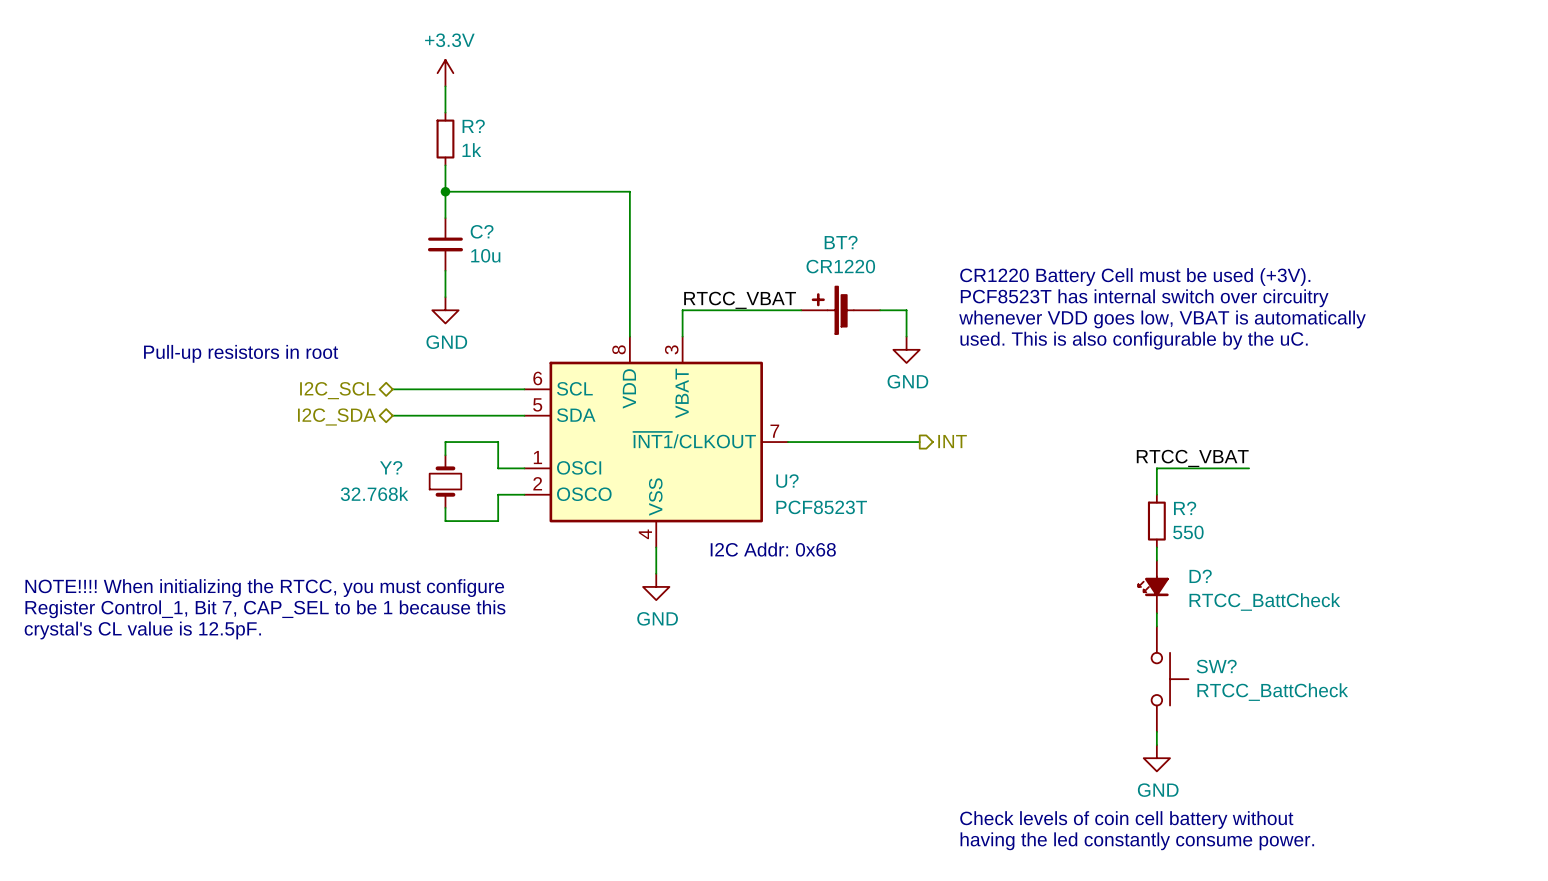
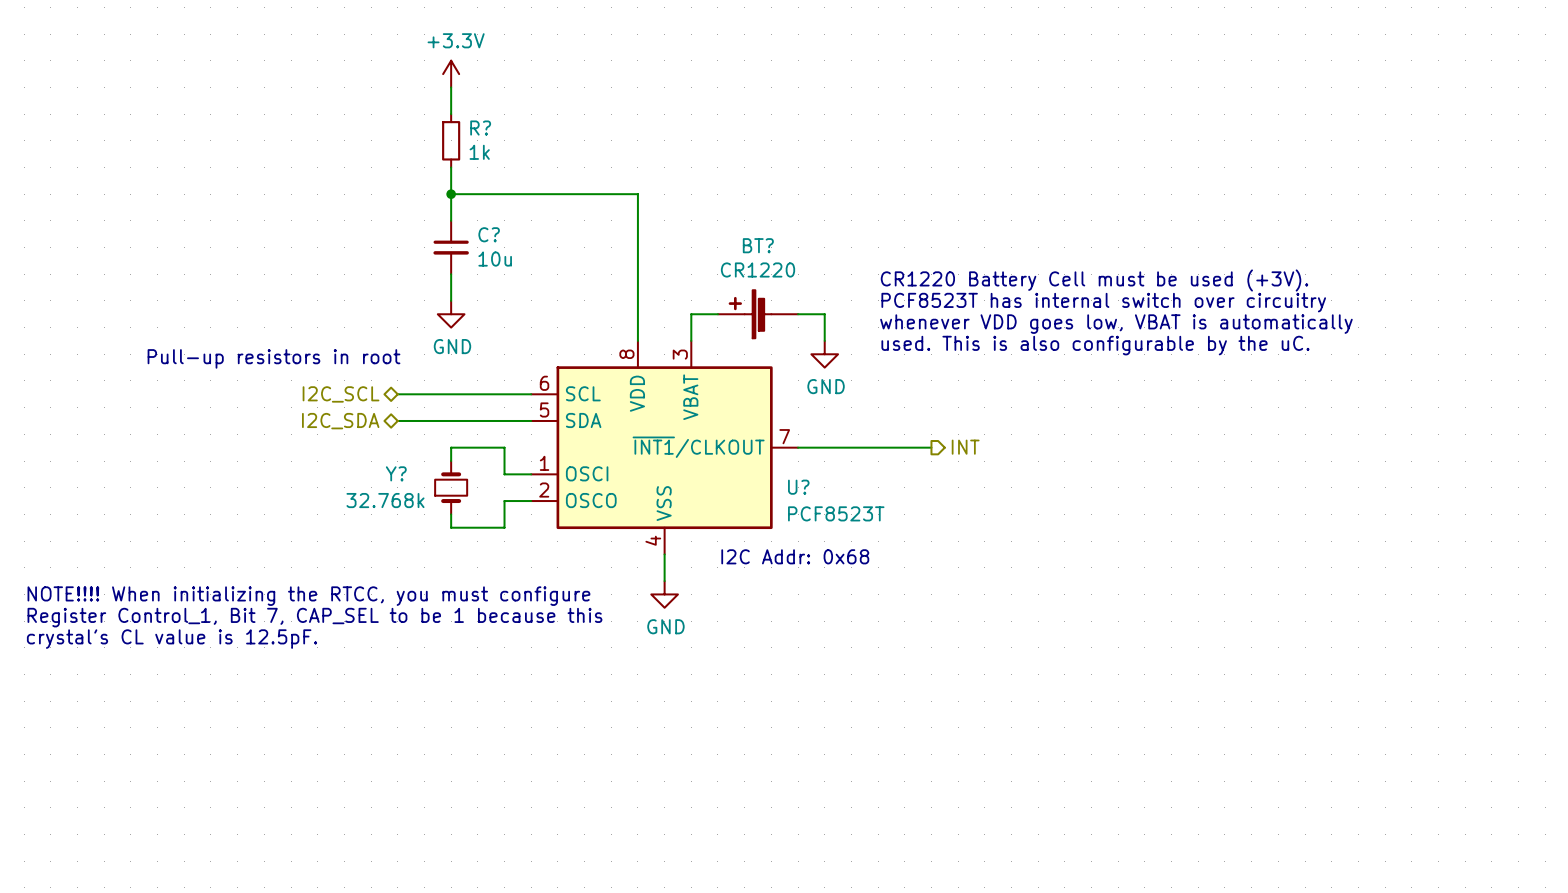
text position: CR1220 Battery Cell must be used (+3V). (1135, 277) -> CR1220 Battery Cell must be used (+3V). (1094, 280)
text position: PCF8523T has internal switch over circuitry (1144, 298) -> PCF8523T has internal switch over circuitry (1103, 302)
label: RTCC_VBAT (740, 300) -> none
wire: none -> (811, 314) (824, 314) (824, 340)
BT? position: (840, 310) -> (758, 314)
wire: (880, 310) (906, 310) (906, 336) -> none
text position: whenever VDD goes low, VBAT is automatically (1162, 319) -> whenever VDD goes low, VBAT is automatically (1116, 324)
text position: used. This is also configurable by the uC. (1134, 340) -> used. This is also configurable by the uC. (1095, 345)
power symbol position: GND (906, 349) -> GND (824, 354)
label: RTCC_VBAT (1192, 458) -> none
wire: (1249, 468) (1156, 468) (1156, 494) -> none
R?: 550 (1156, 521) -> none
wire: (1156, 547) (1156, 560) -> none
D?: RTCC_BattCheck (1153, 586) -> none
wire: (1156, 613) (1156, 626) -> none
SW?: RTCC_BattCheck (1170, 679) -> none
wire: (1156, 731) (1156, 745) -> none
power symbol: GND (1156, 758) -> none
text: Check levels of coin cell battery without (1126, 820) -> none
text: having the led constantly consume power. (1137, 841) -> none

